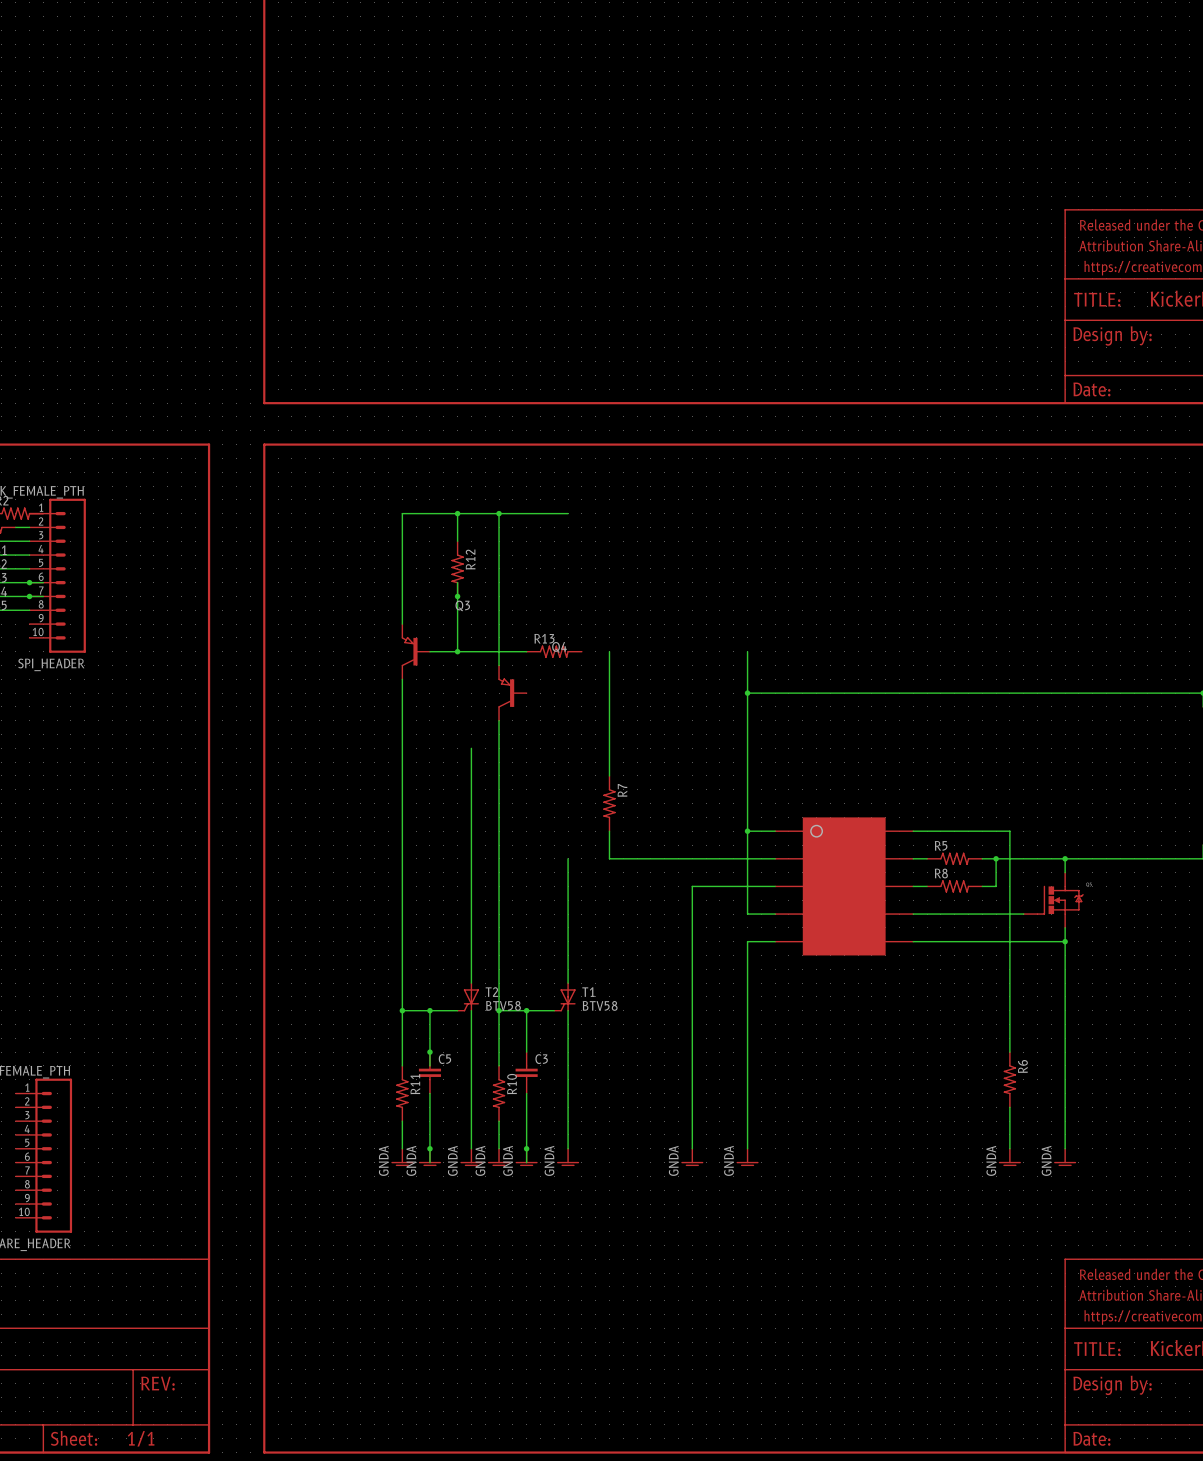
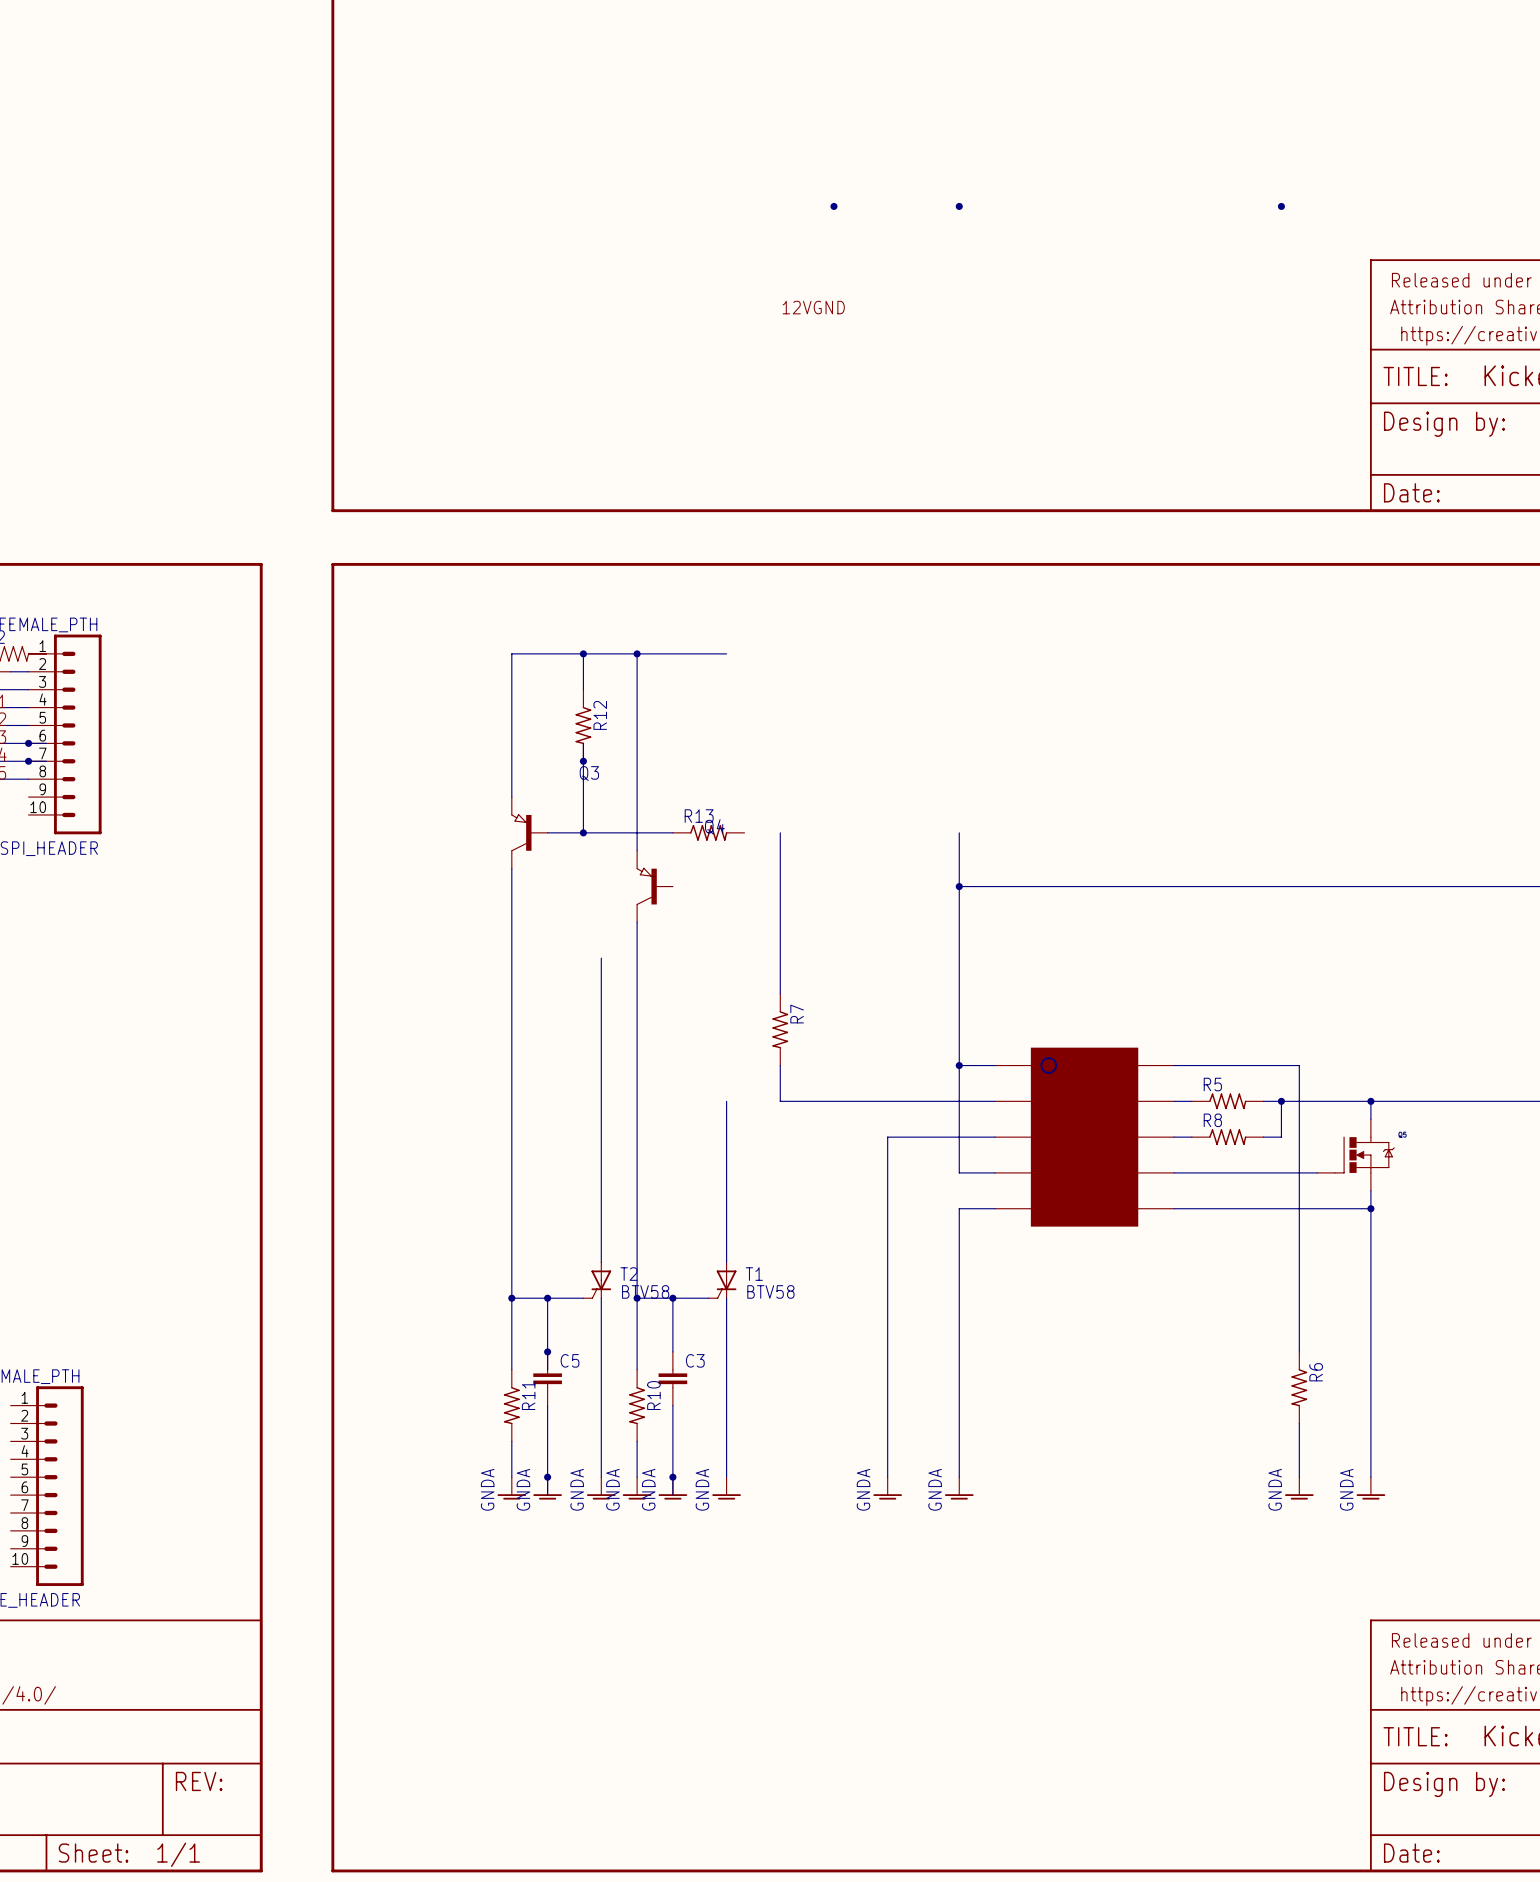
junction: none -> (833, 206)
junction: none -> (959, 206)
junction: none -> (1281, 206)
label: none -> 12VGND (813, 307)

